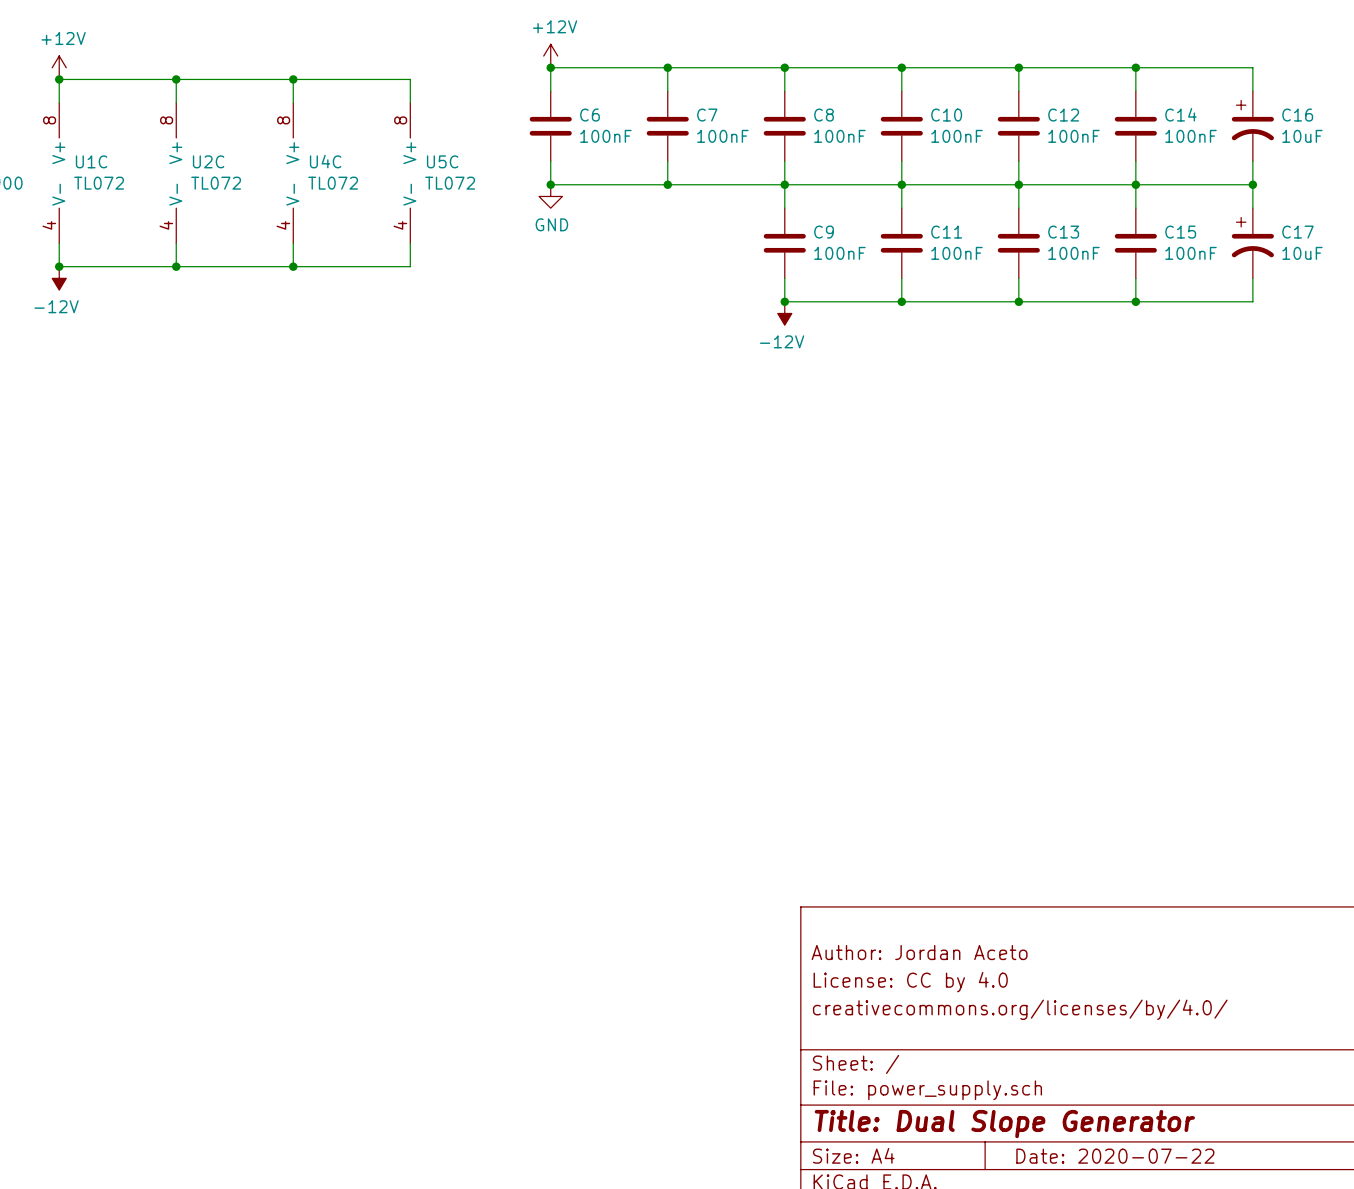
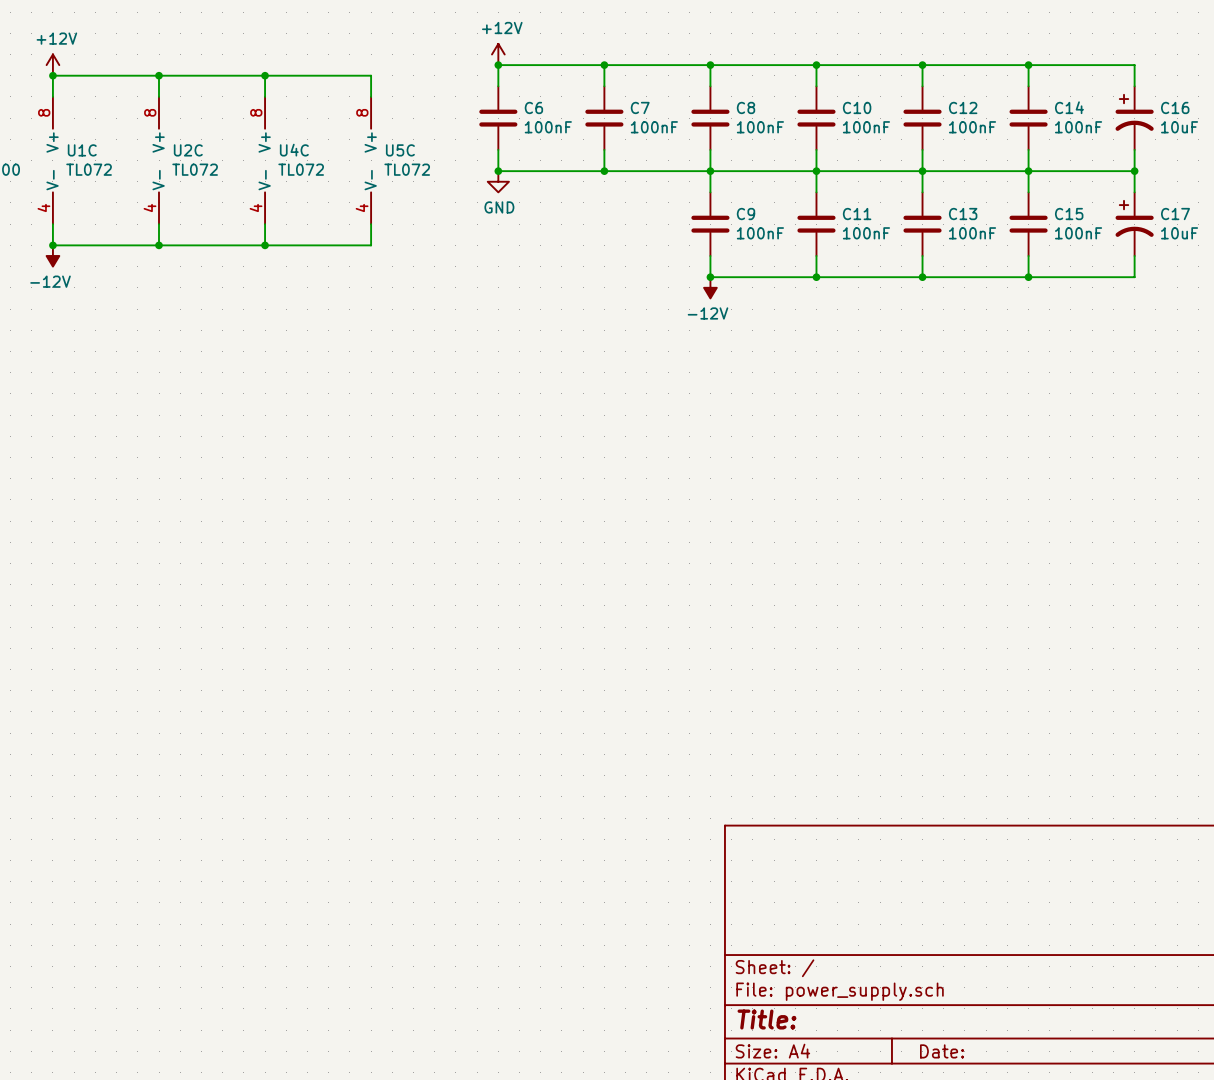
title block: Author: Jordan Aceto (919, 952) -> none
title block: License: CC by 4.0 (910, 982) -> none
title block: creativecommons.org/licenses/by/4.0/ (1020, 1009) -> none
title block: Title: Dual Slope Generator (1004, 1124) -> Title: (766, 1019)
title block: Date: 2020-07-22 (1115, 1156) -> Date: (942, 1051)

